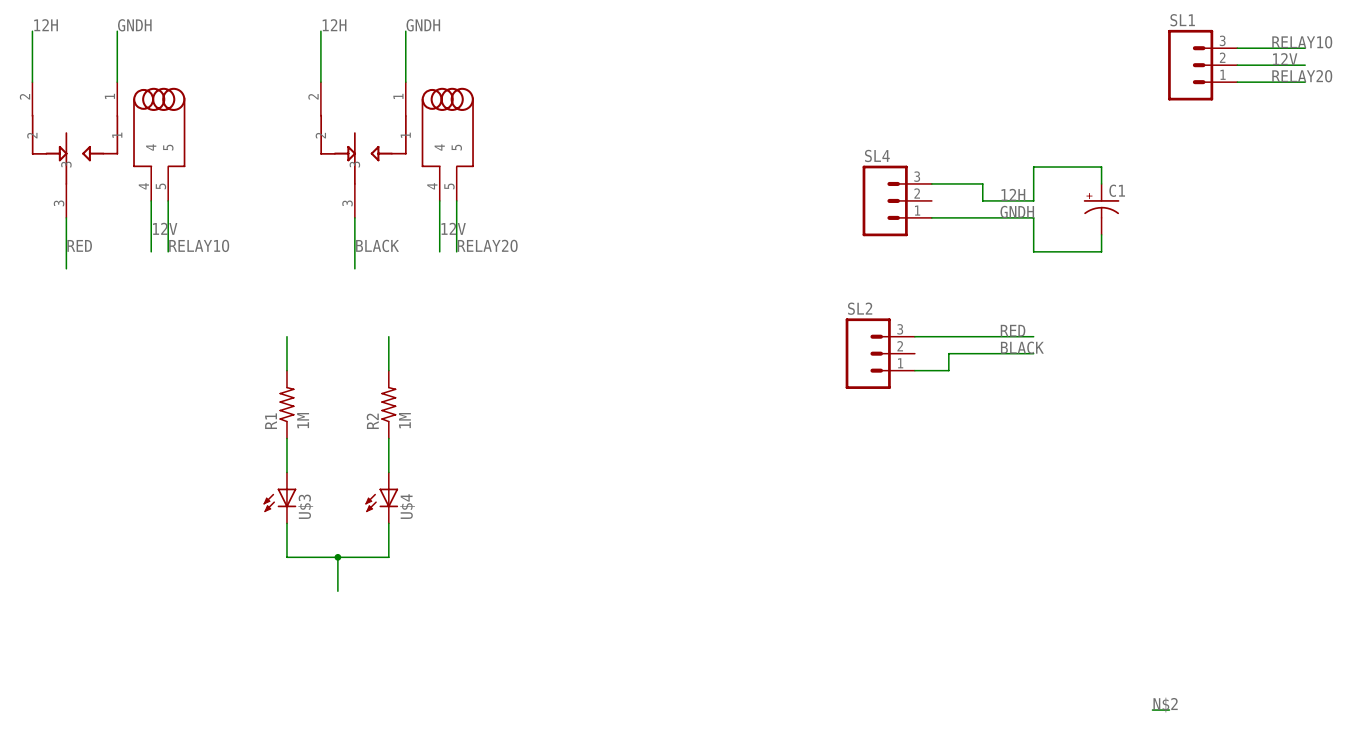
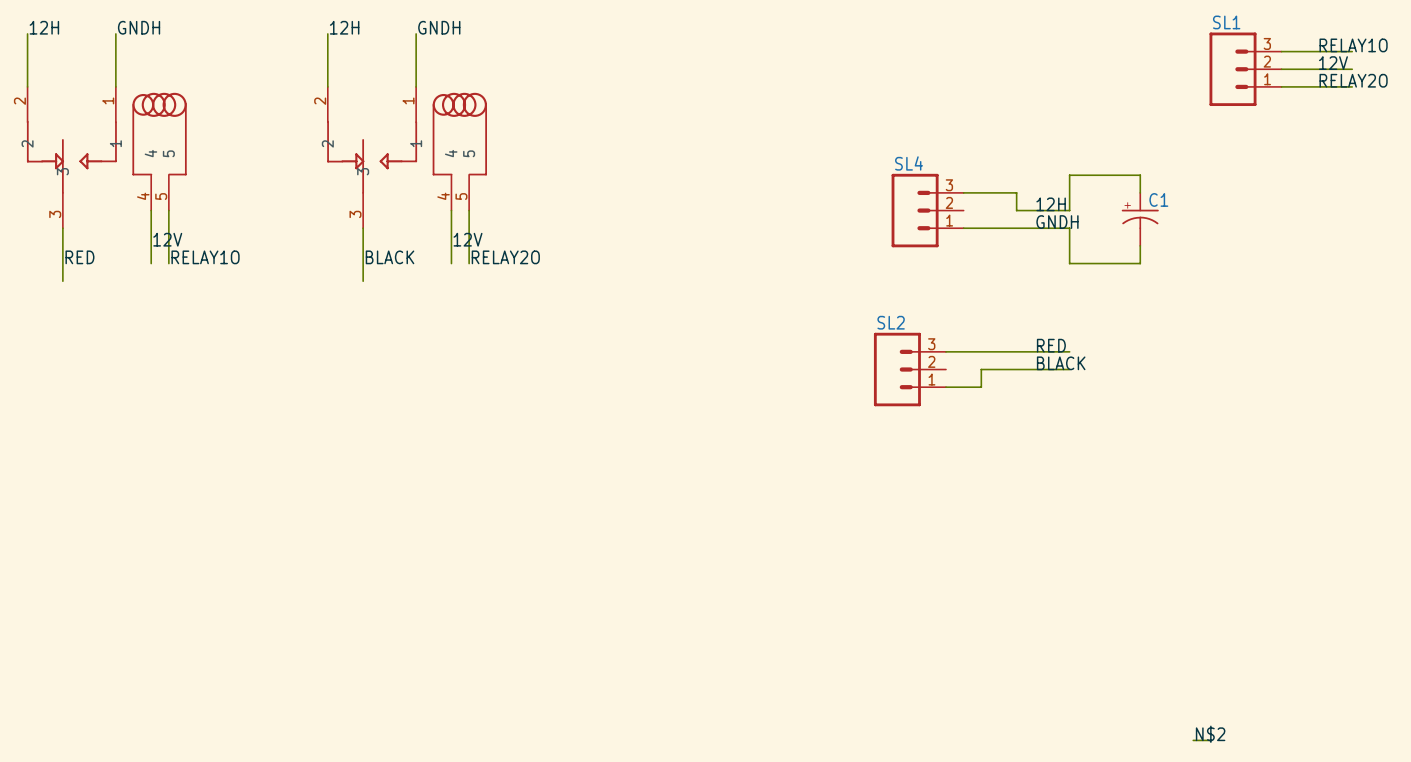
wire: (286, 336) (286, 370) -> none
wire: (388, 336) (388, 370) -> none
R1: 1M (286, 404) -> none
R2: 1M (388, 404) -> none
wire: (286, 438) (286, 472) -> none
wire: (388, 438) (388, 472) -> none
U$3: (279, 497) -> none
U$4: (381, 497) -> none
wire: (286, 523) (286, 557) (388, 557) (388, 523) -> none
wire: (337, 557) (337, 591) -> none
junction: (337, 557) -> none

